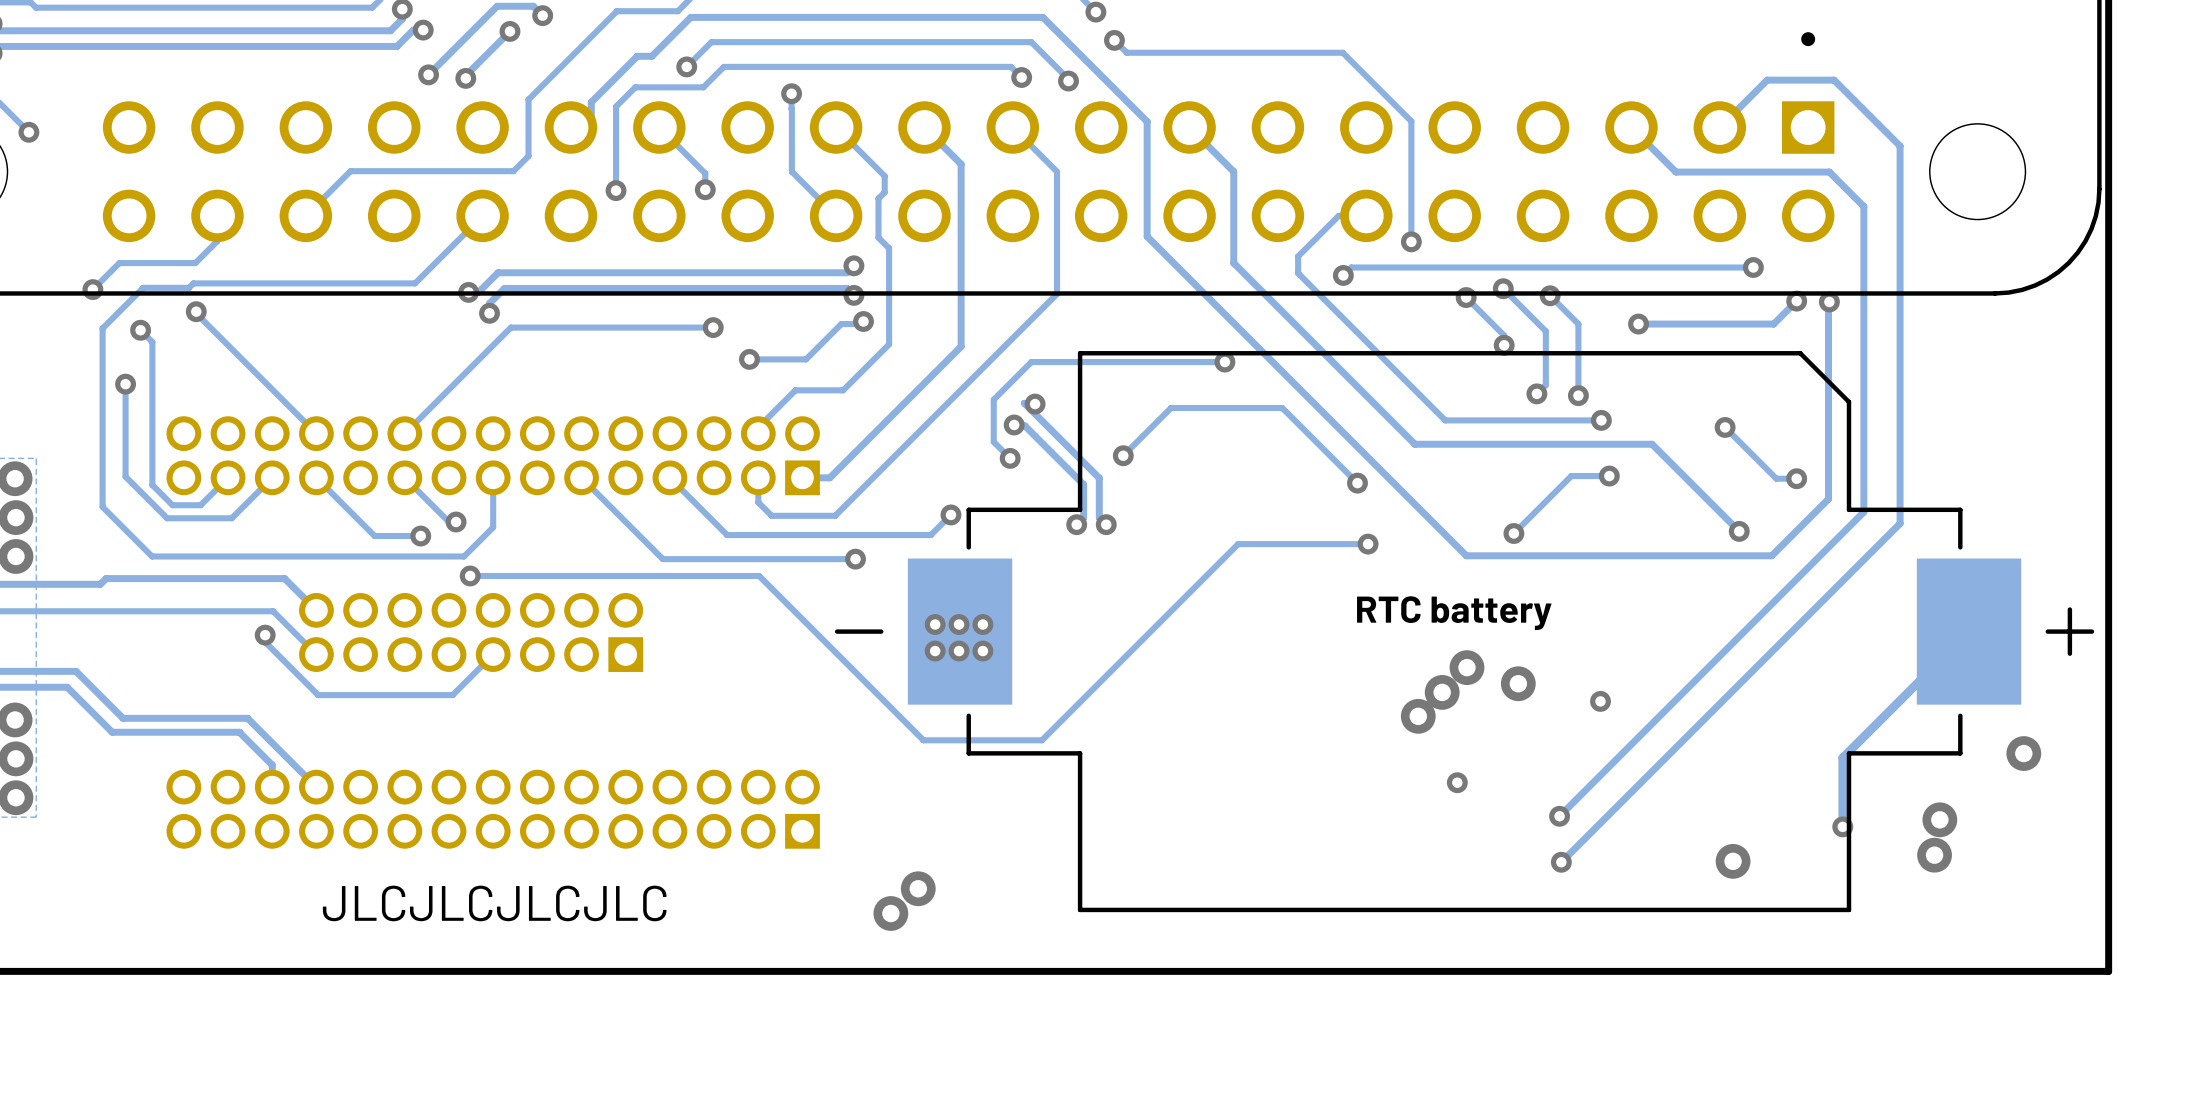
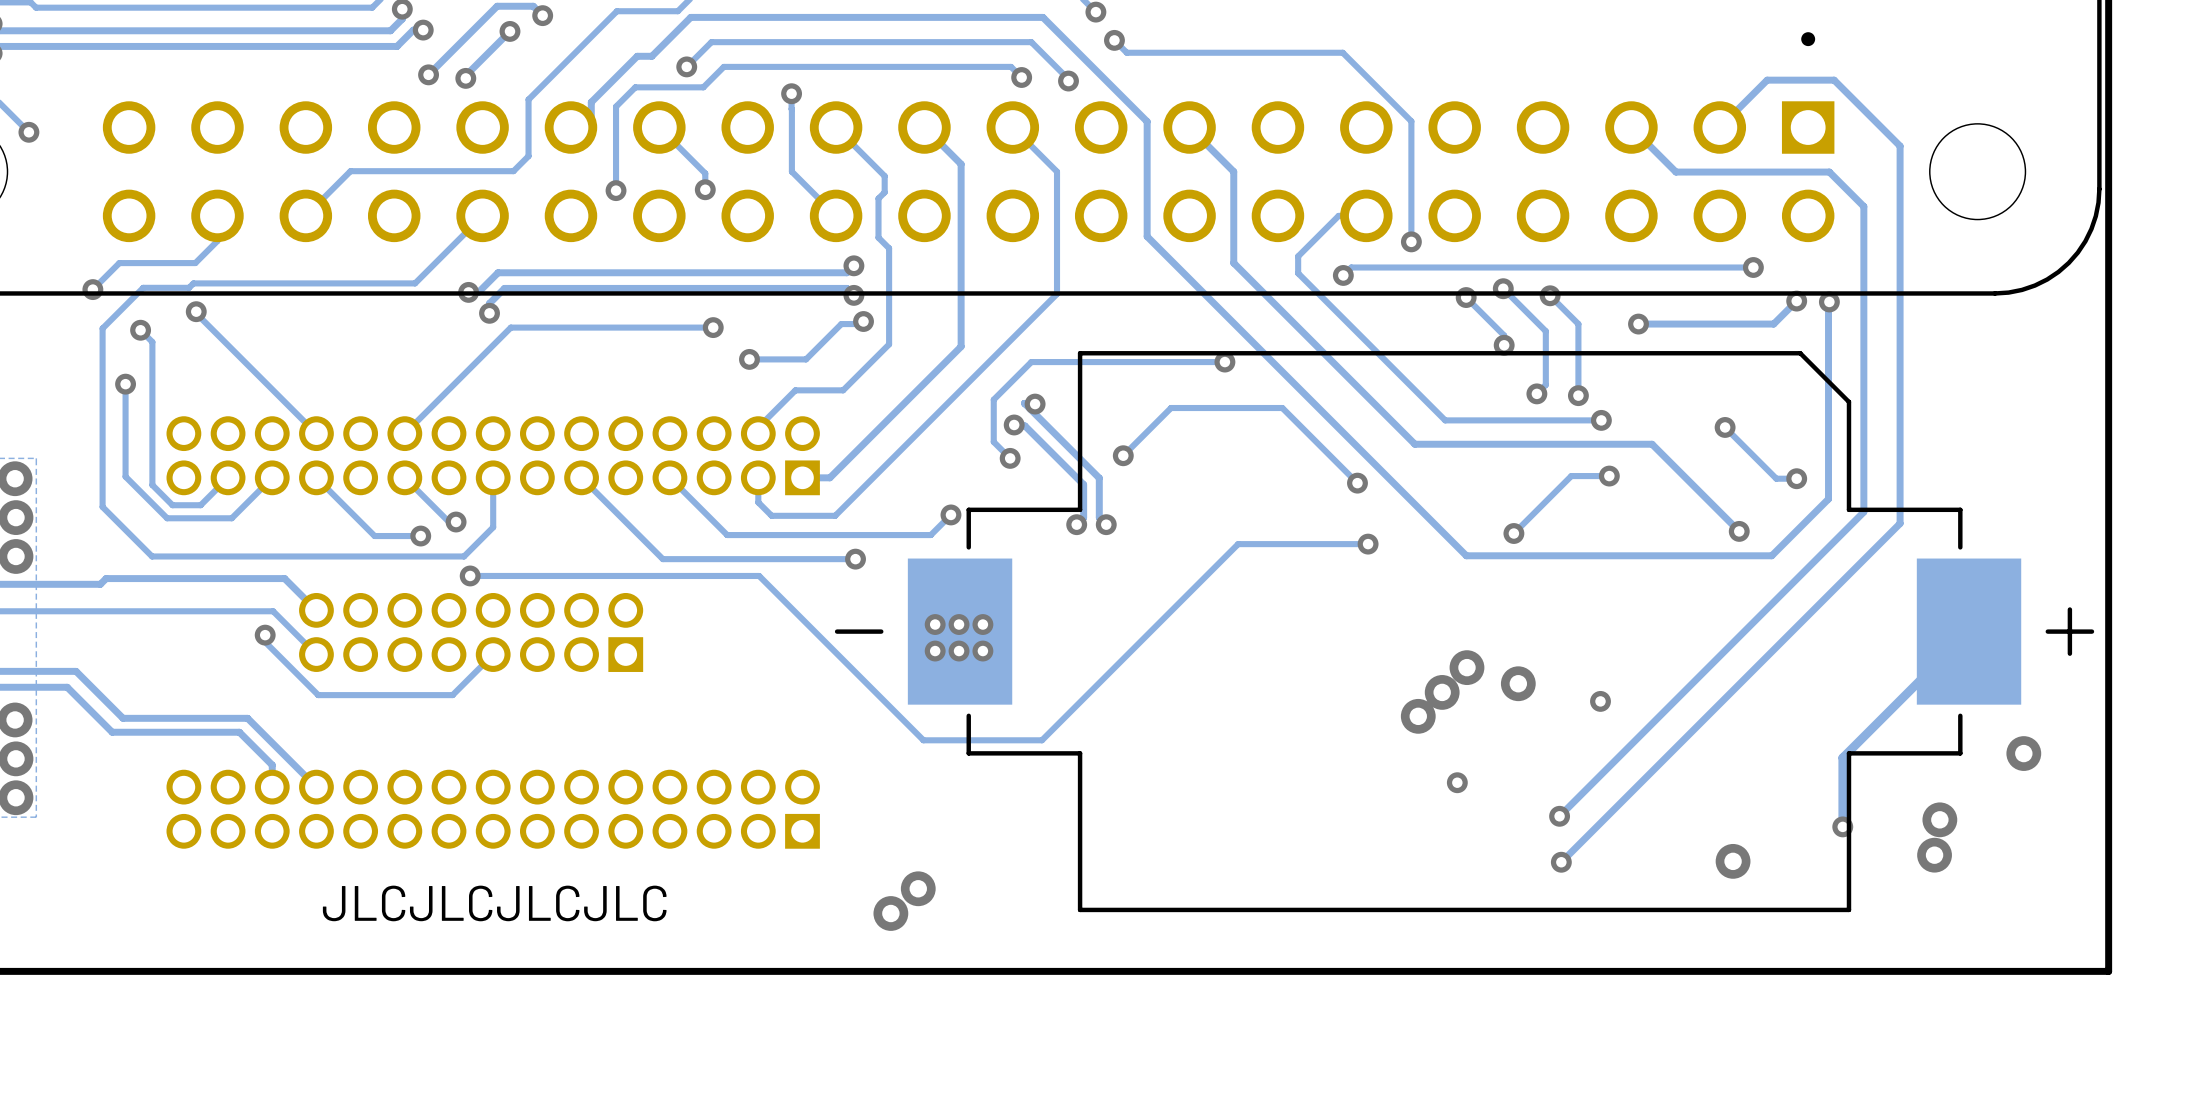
text: RTC battery (1454, 613) -> none

